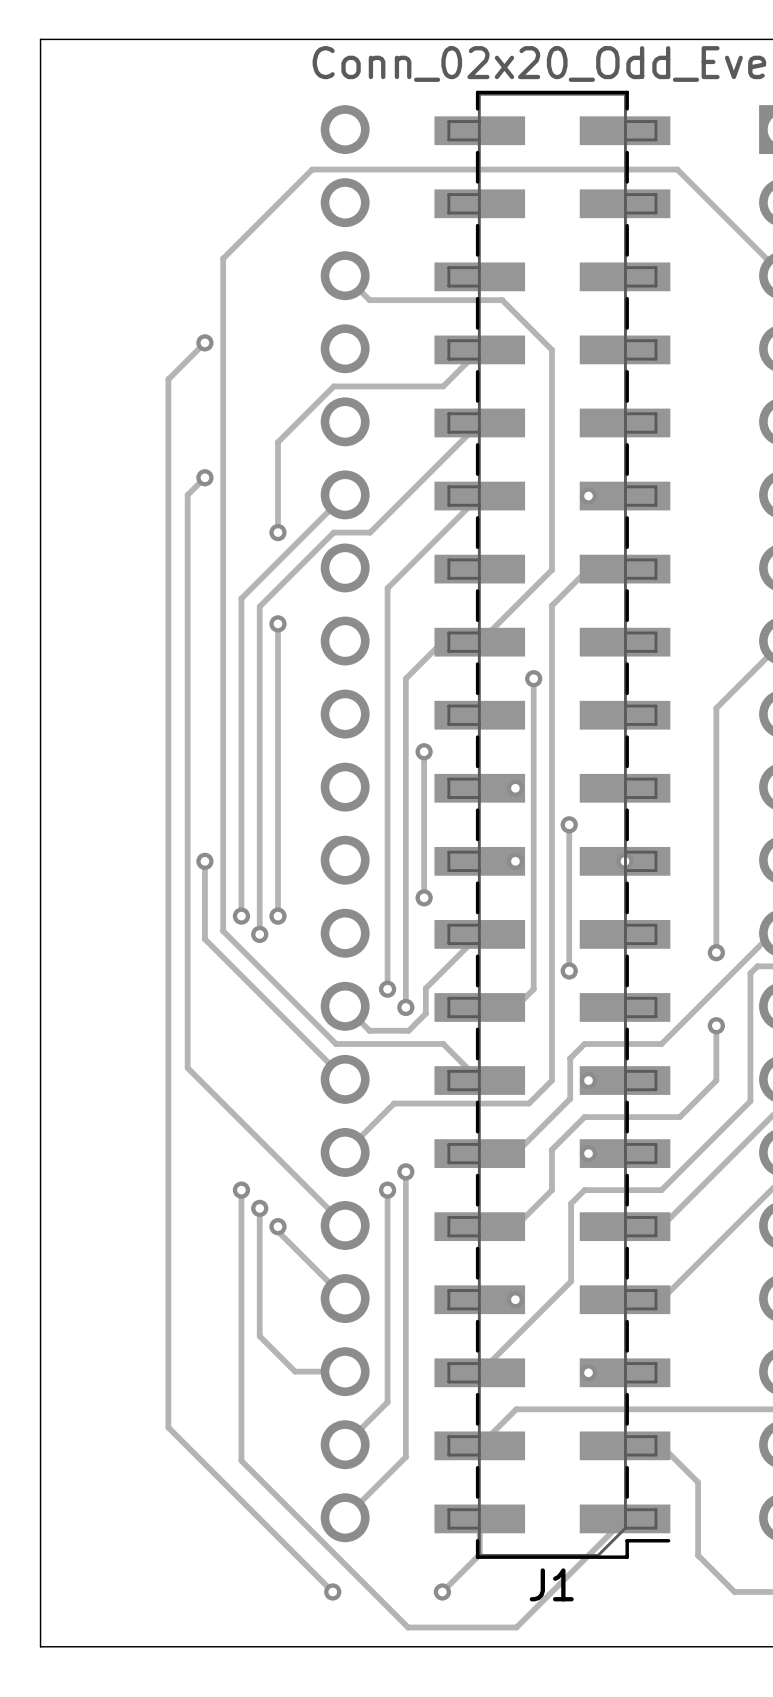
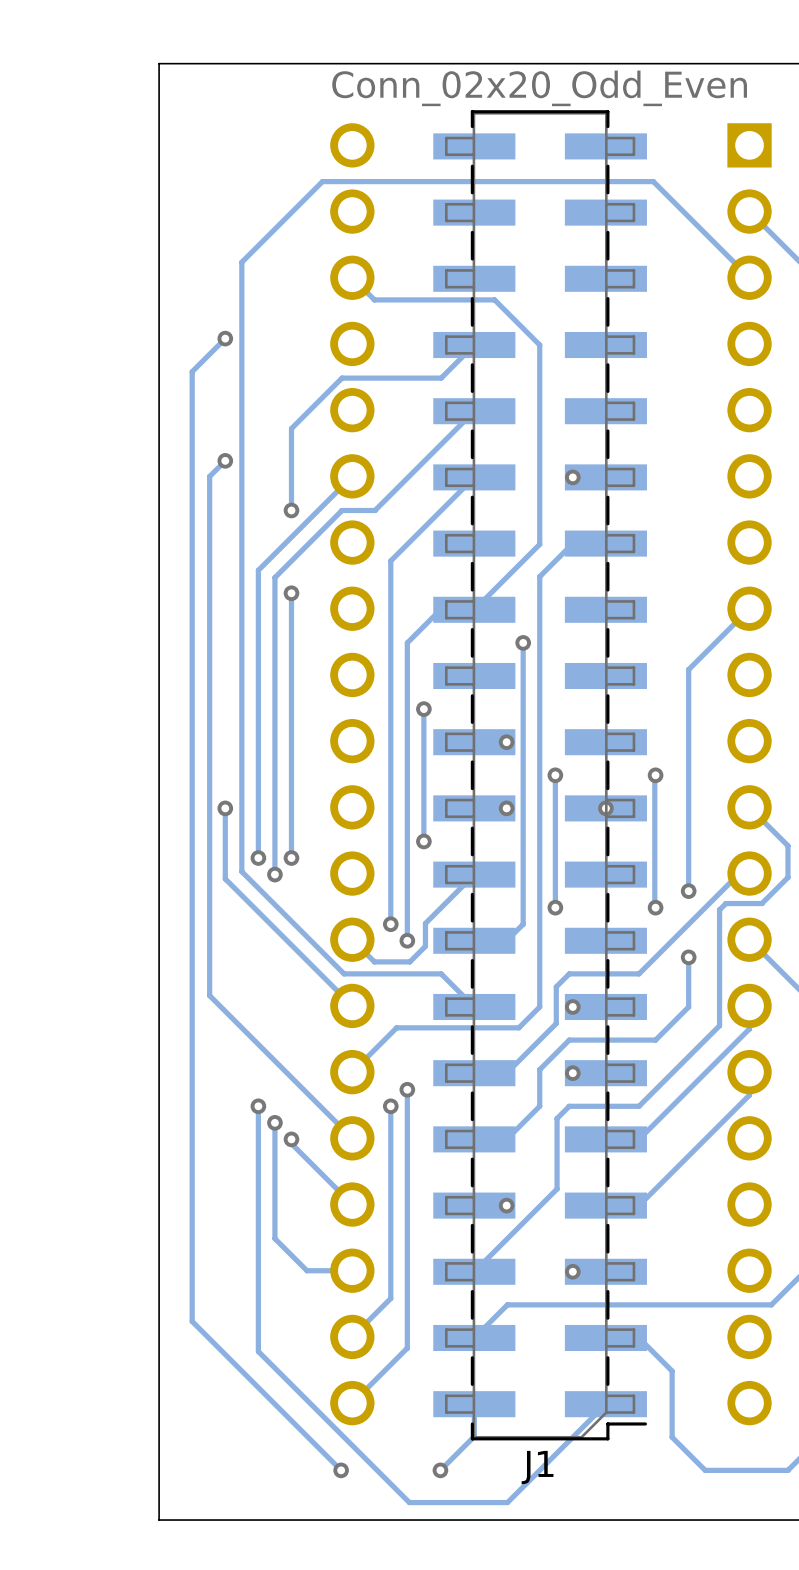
board edge: (131, 39) (40, 39) (40, 1646) (131, 1646) -> (159, 63) (159, 1520)
track: none -> (655, 775) (655, 907)
via: none -> (655, 775)
via: none -> (655, 907)

